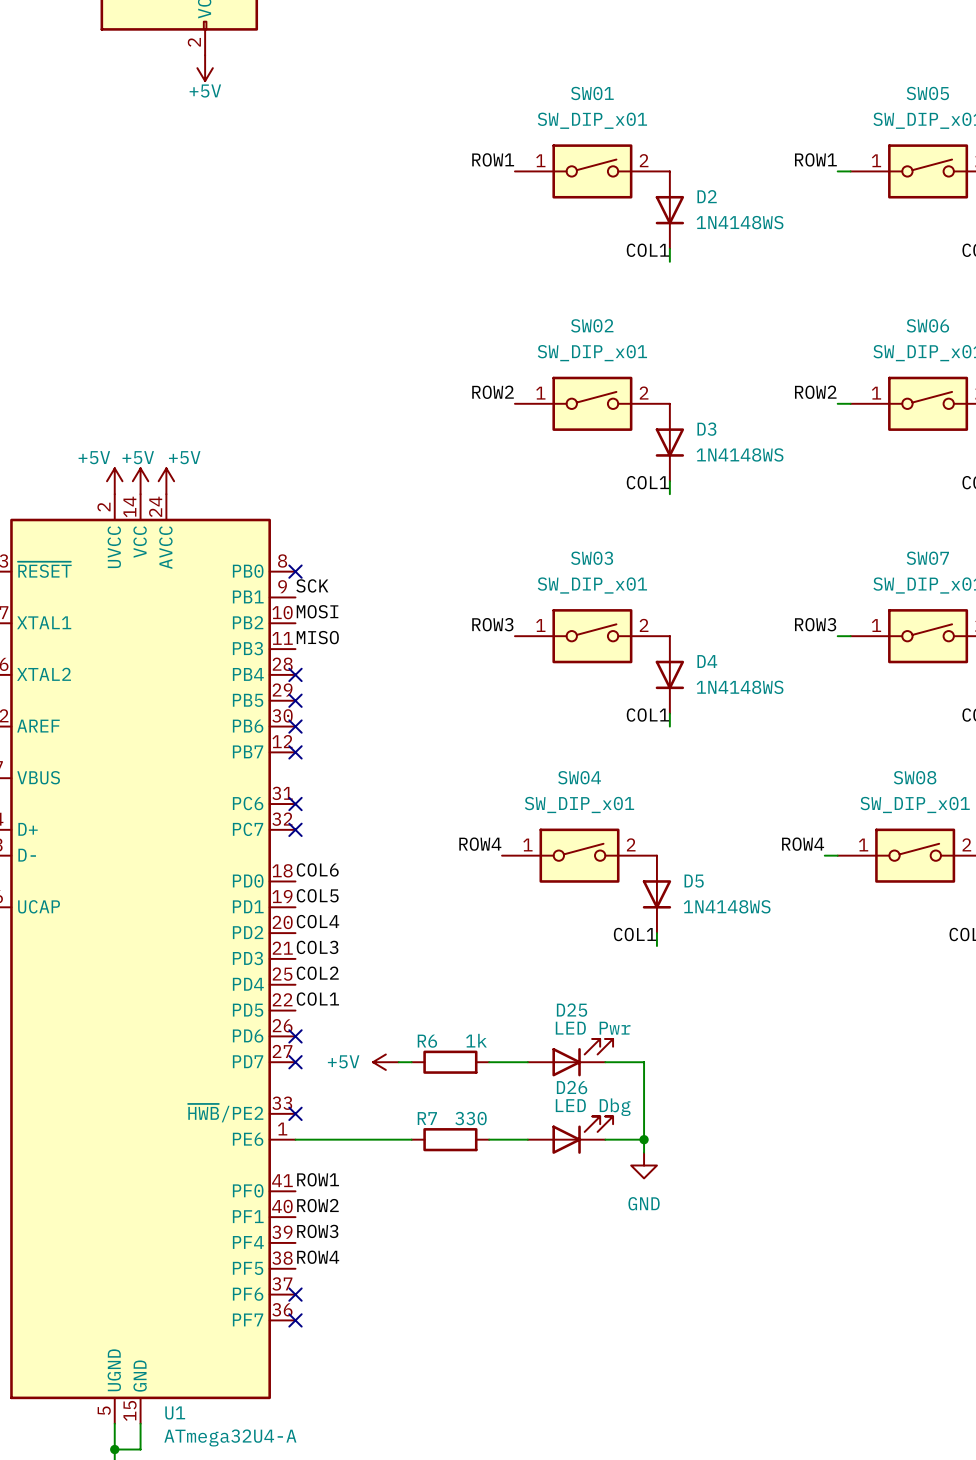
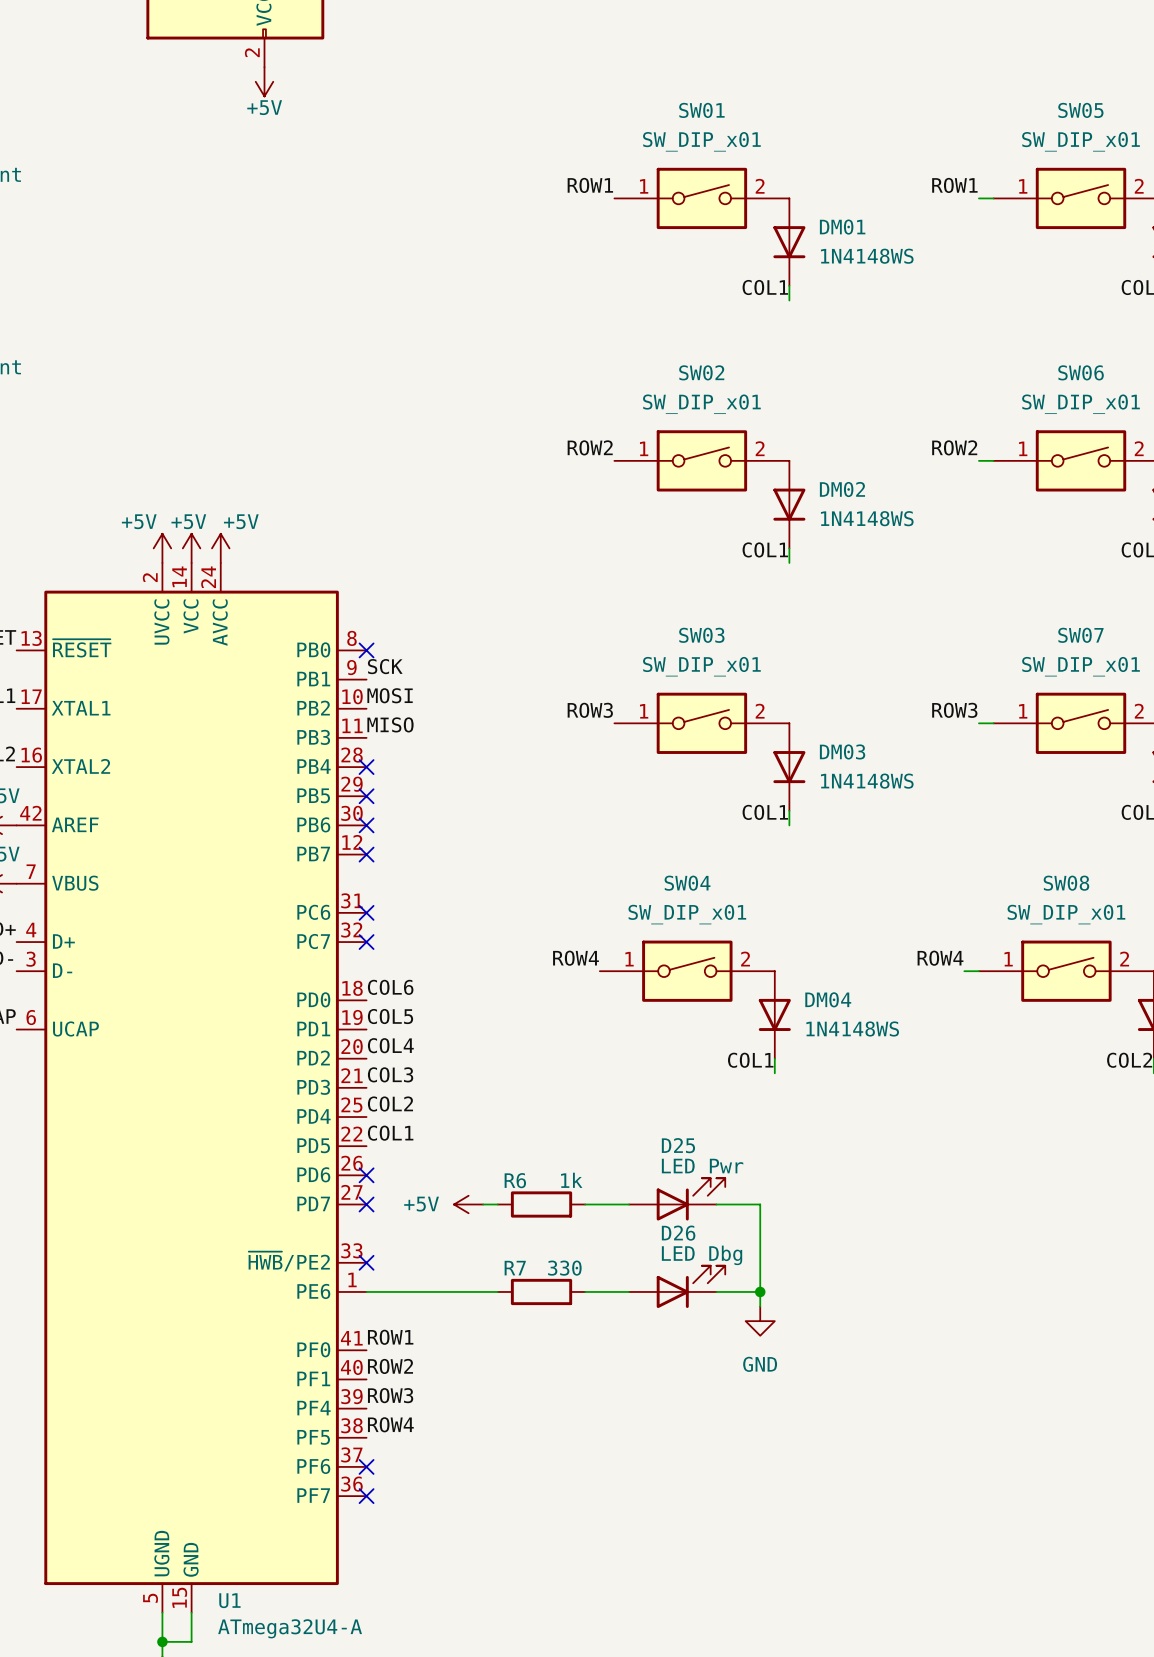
D2 name: D2 (707, 196) -> DM01 (842, 227)
D3 name: D3 (706, 429) -> DM02 (842, 489)
D4 name: D4 (707, 661) -> DM03 (842, 751)
D5 name: D5 (694, 881) -> DM04 (828, 999)

